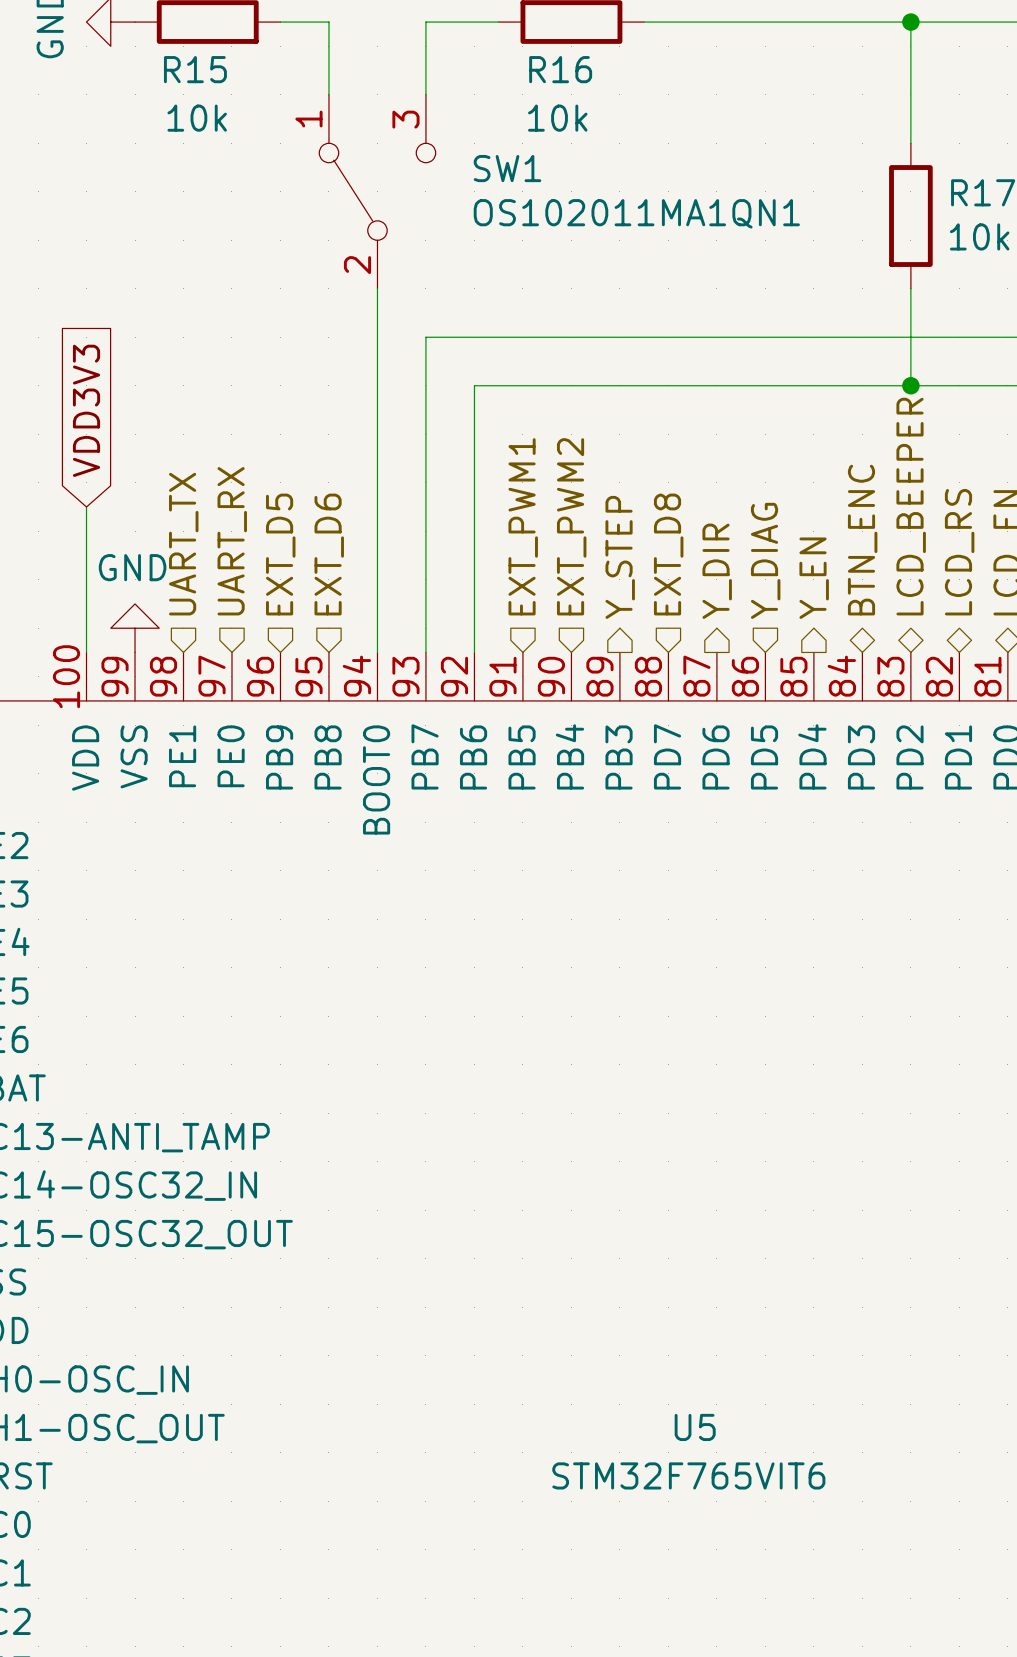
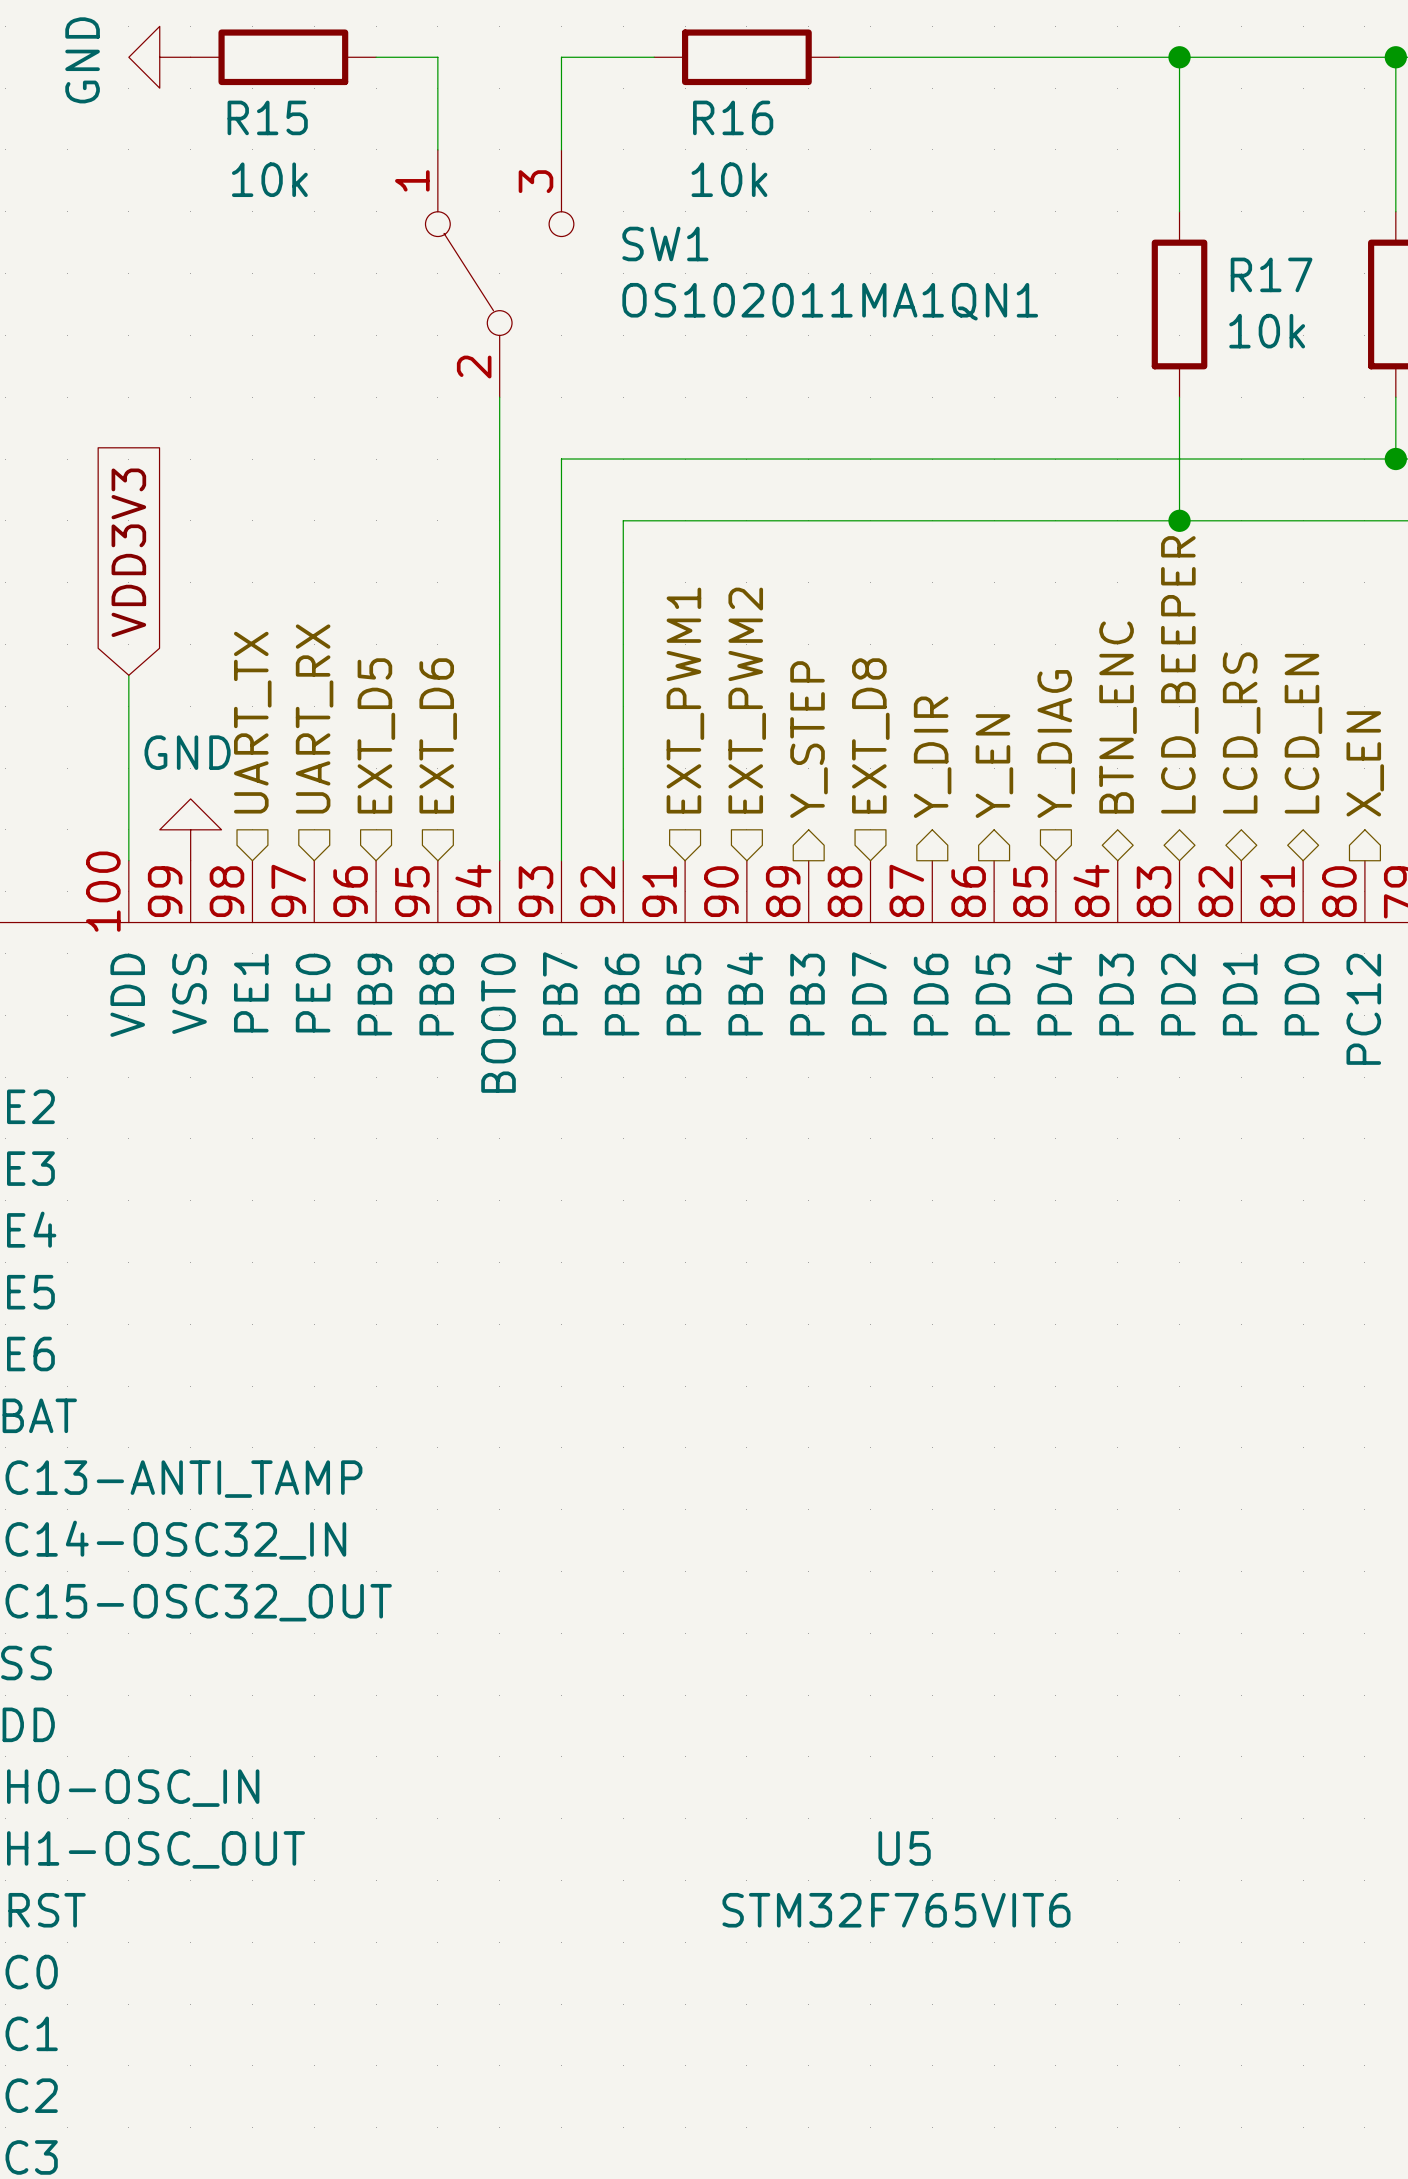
hierarchical label shape: input (765, 560) -> output (994, 766)
hierarchical label: Y_DIAG (765, 560) -> Y_EN (994, 766)
hierarchical label shape: output (814, 578) -> input (1056, 743)
hierarchical label: Y_EN (814, 578) -> Y_DIAG (1056, 743)

